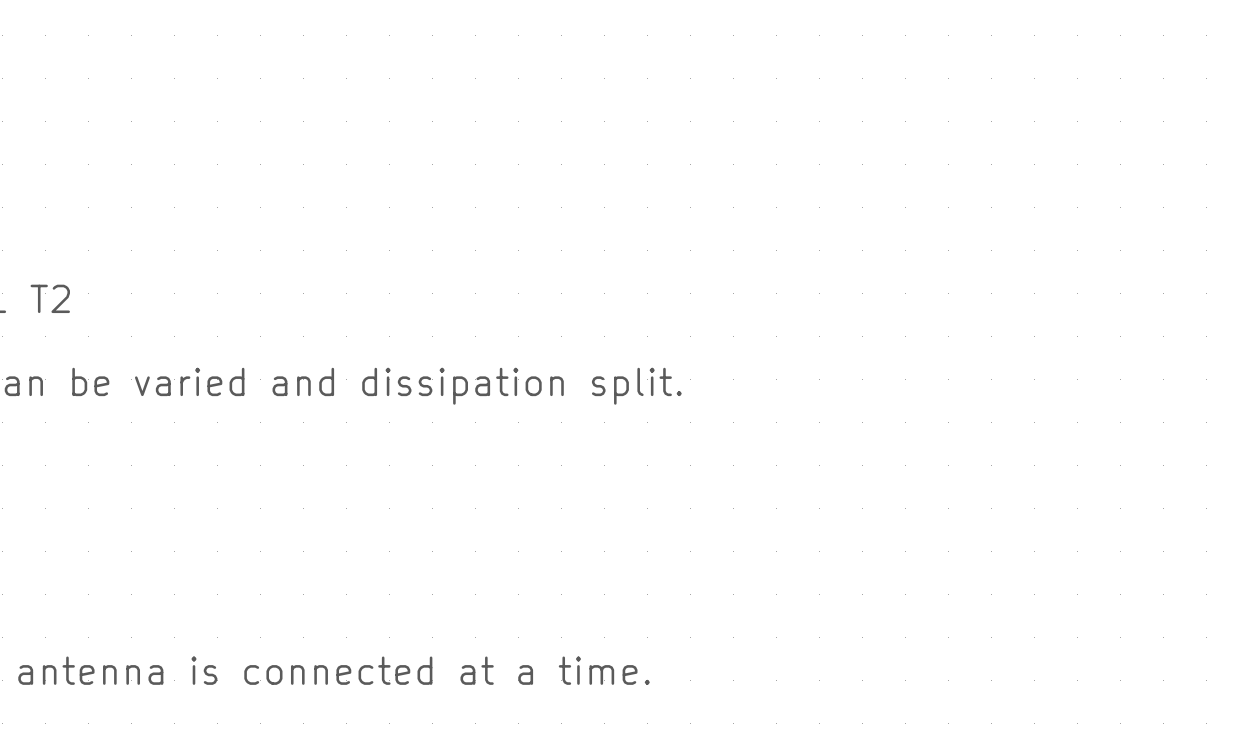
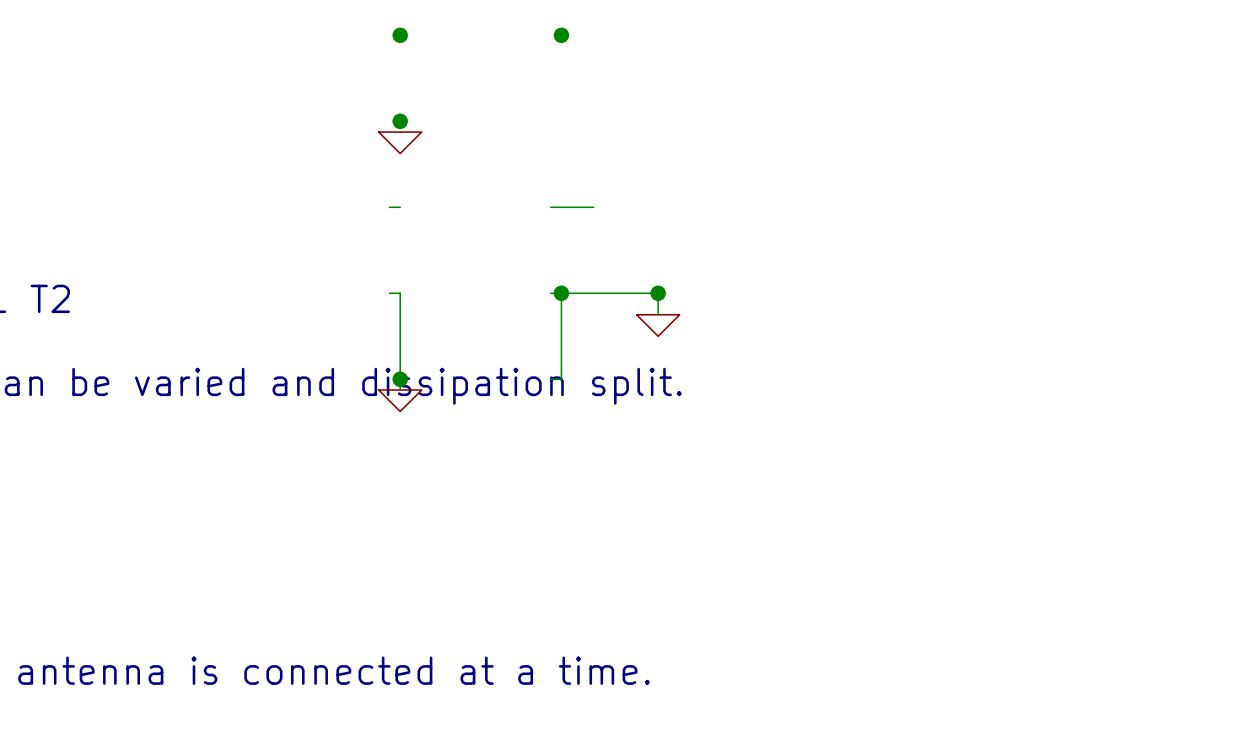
junction: none -> (400, 35)
junction: none -> (561, 35)
junction: none -> (400, 121)
power symbol: none -> (400, 142)
wire: none -> (389, 207) (400, 207)
wire: none -> (550, 207) (593, 207)
wire: none -> (389, 293) (400, 293) (400, 390)
wire: none -> (550, 293) (658, 293) (658, 314)
wire: none -> (561, 293) (561, 379) (550, 379)
junction: none -> (561, 293)
junction: none -> (658, 293)
power symbol: none -> (658, 325)
junction: none -> (400, 379)
power symbol: none -> (400, 400)

